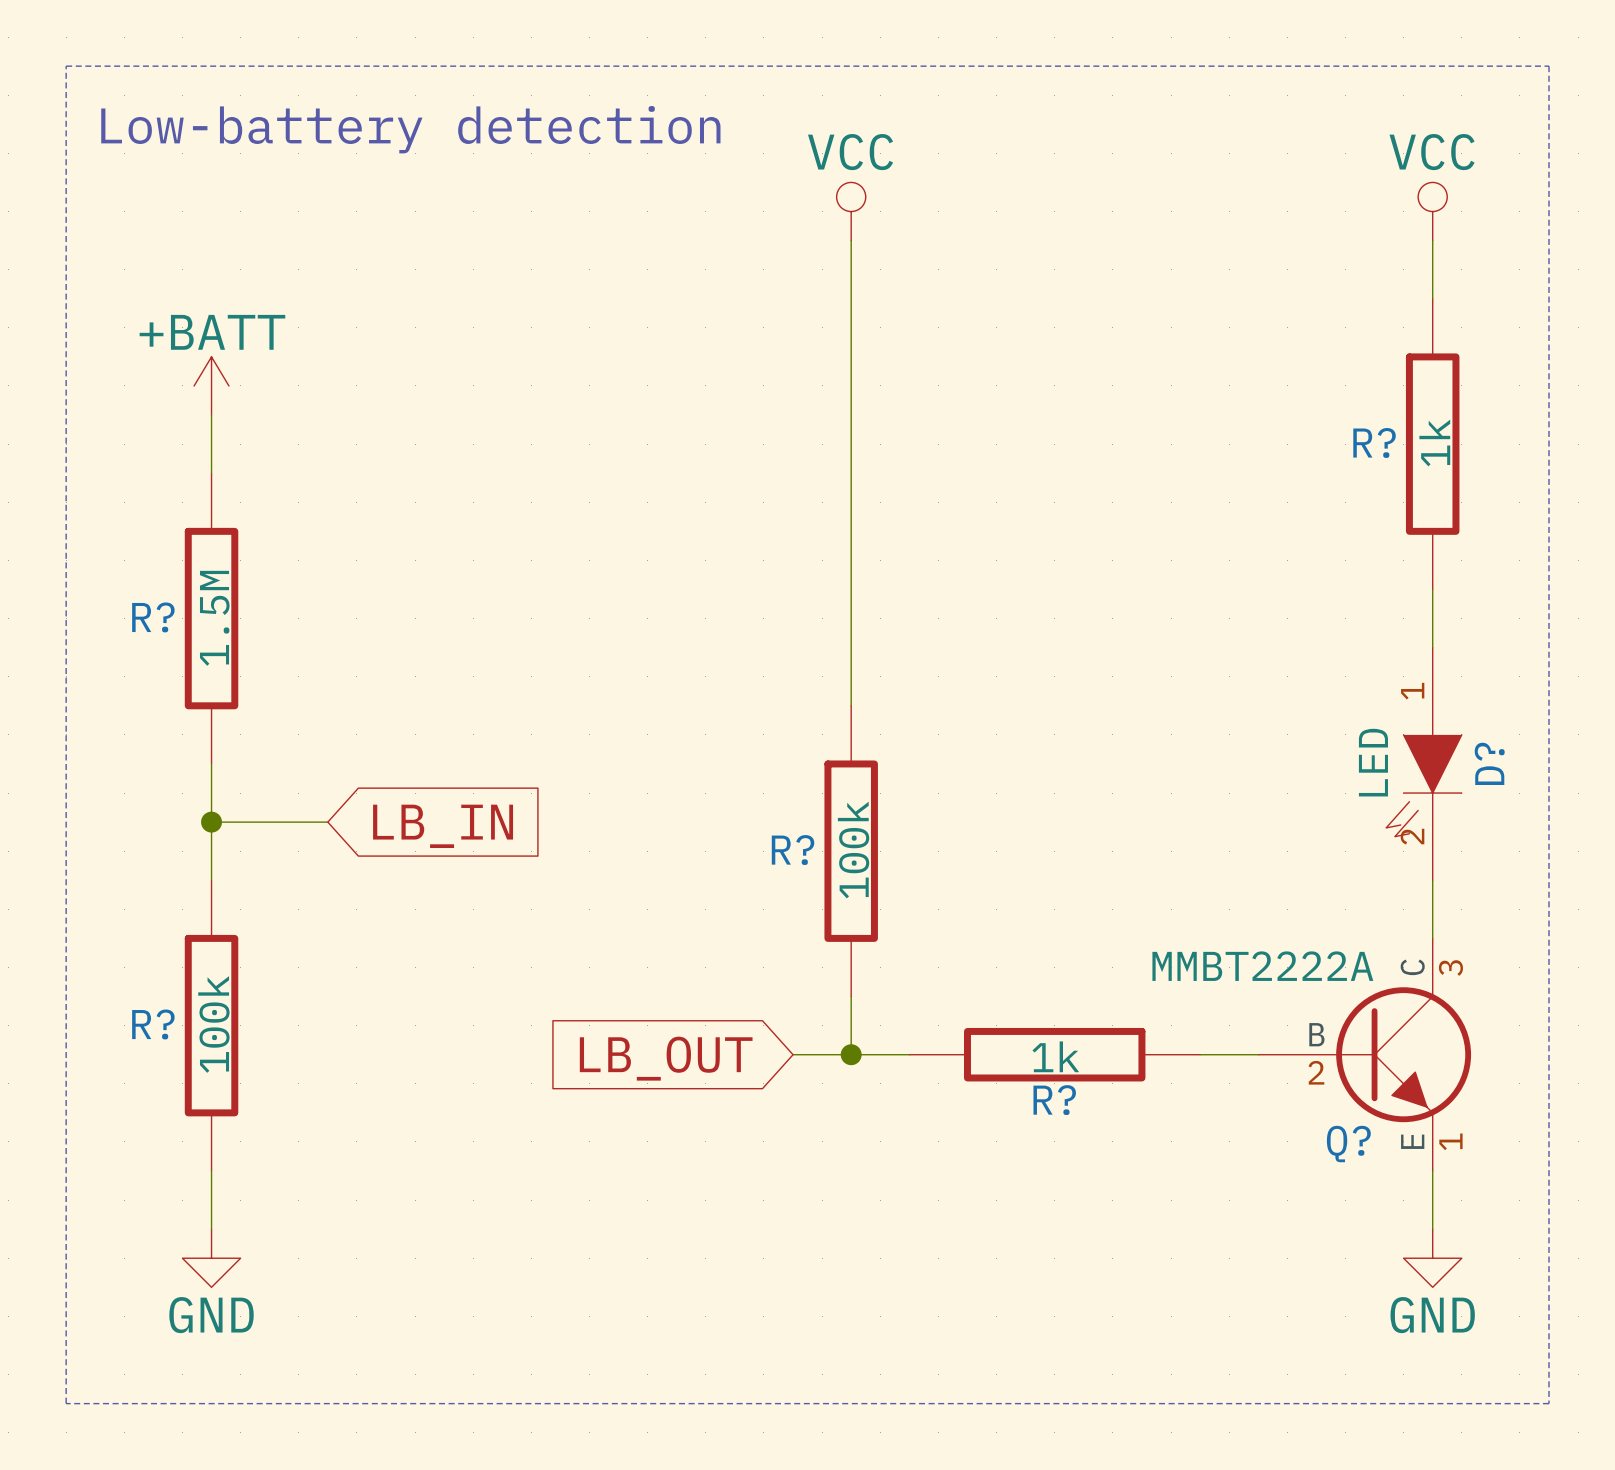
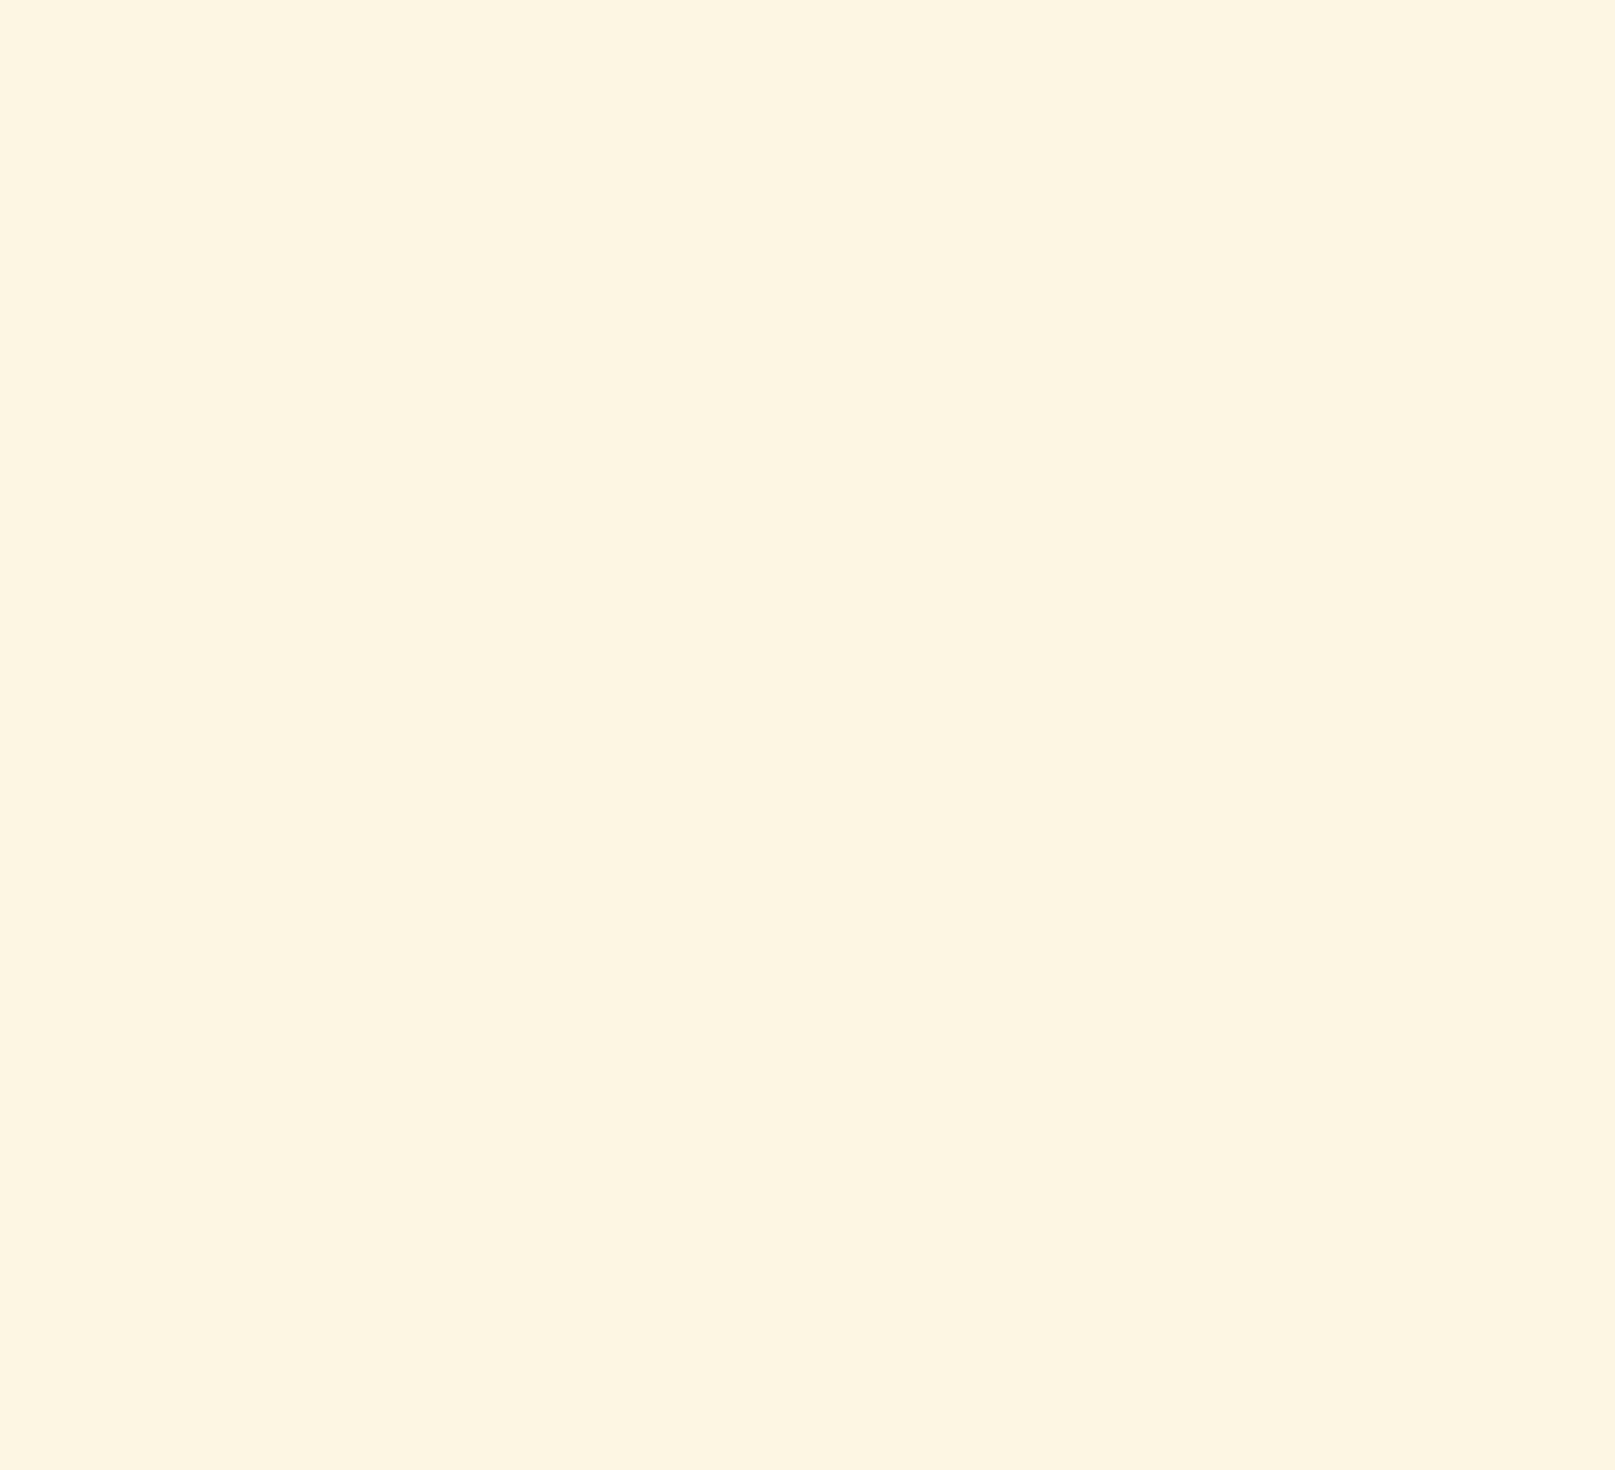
line: (66, 66) (66, 1403) (1548, 1403) (1548, 66) (66, 66) -> none
text: Low-battery detection (410, 129) -> none
power symbol: VCC (851, 211) -> none
power symbol: VCC (1432, 211) -> none
wire: (851, 240) (851, 705) -> none
wire: (1432, 240) (1432, 298) -> none
power symbol: +BATT (211, 385) -> none
wire: (211, 415) (211, 473) -> none
R?: 1k (1432, 444) -> none
wire: (1432, 589) (1432, 647) -> none
R?: 1.5M (211, 618) -> none
wire: (211, 763) (211, 880) -> none
D?: LED (1423, 763) -> none
wire: (211, 822) (327, 822) -> none
junction: (211, 822) -> none
global label: LB_IN (443, 826) -> none
R?: 100k (851, 851) -> none
wire: (1432, 880) (1432, 938) -> none
wire: (851, 996) (851, 1054) -> none
R?: 100k (211, 1025) -> none
wire: (793, 1054) (909, 1054) -> none
junction: (851, 1054) -> none
R?: 1k (1054, 1054) -> none
wire: (1200, 1054) (1258, 1054) -> none
Q?: MMBT2222A (1364, 1054) -> none
global label: LB_OUT (666, 1058) -> none
wire: (211, 1171) (211, 1229) -> none
wire: (1432, 1171) (1432, 1229) -> none
power symbol: GND (211, 1258) -> none
power symbol: GND (1432, 1258) -> none

